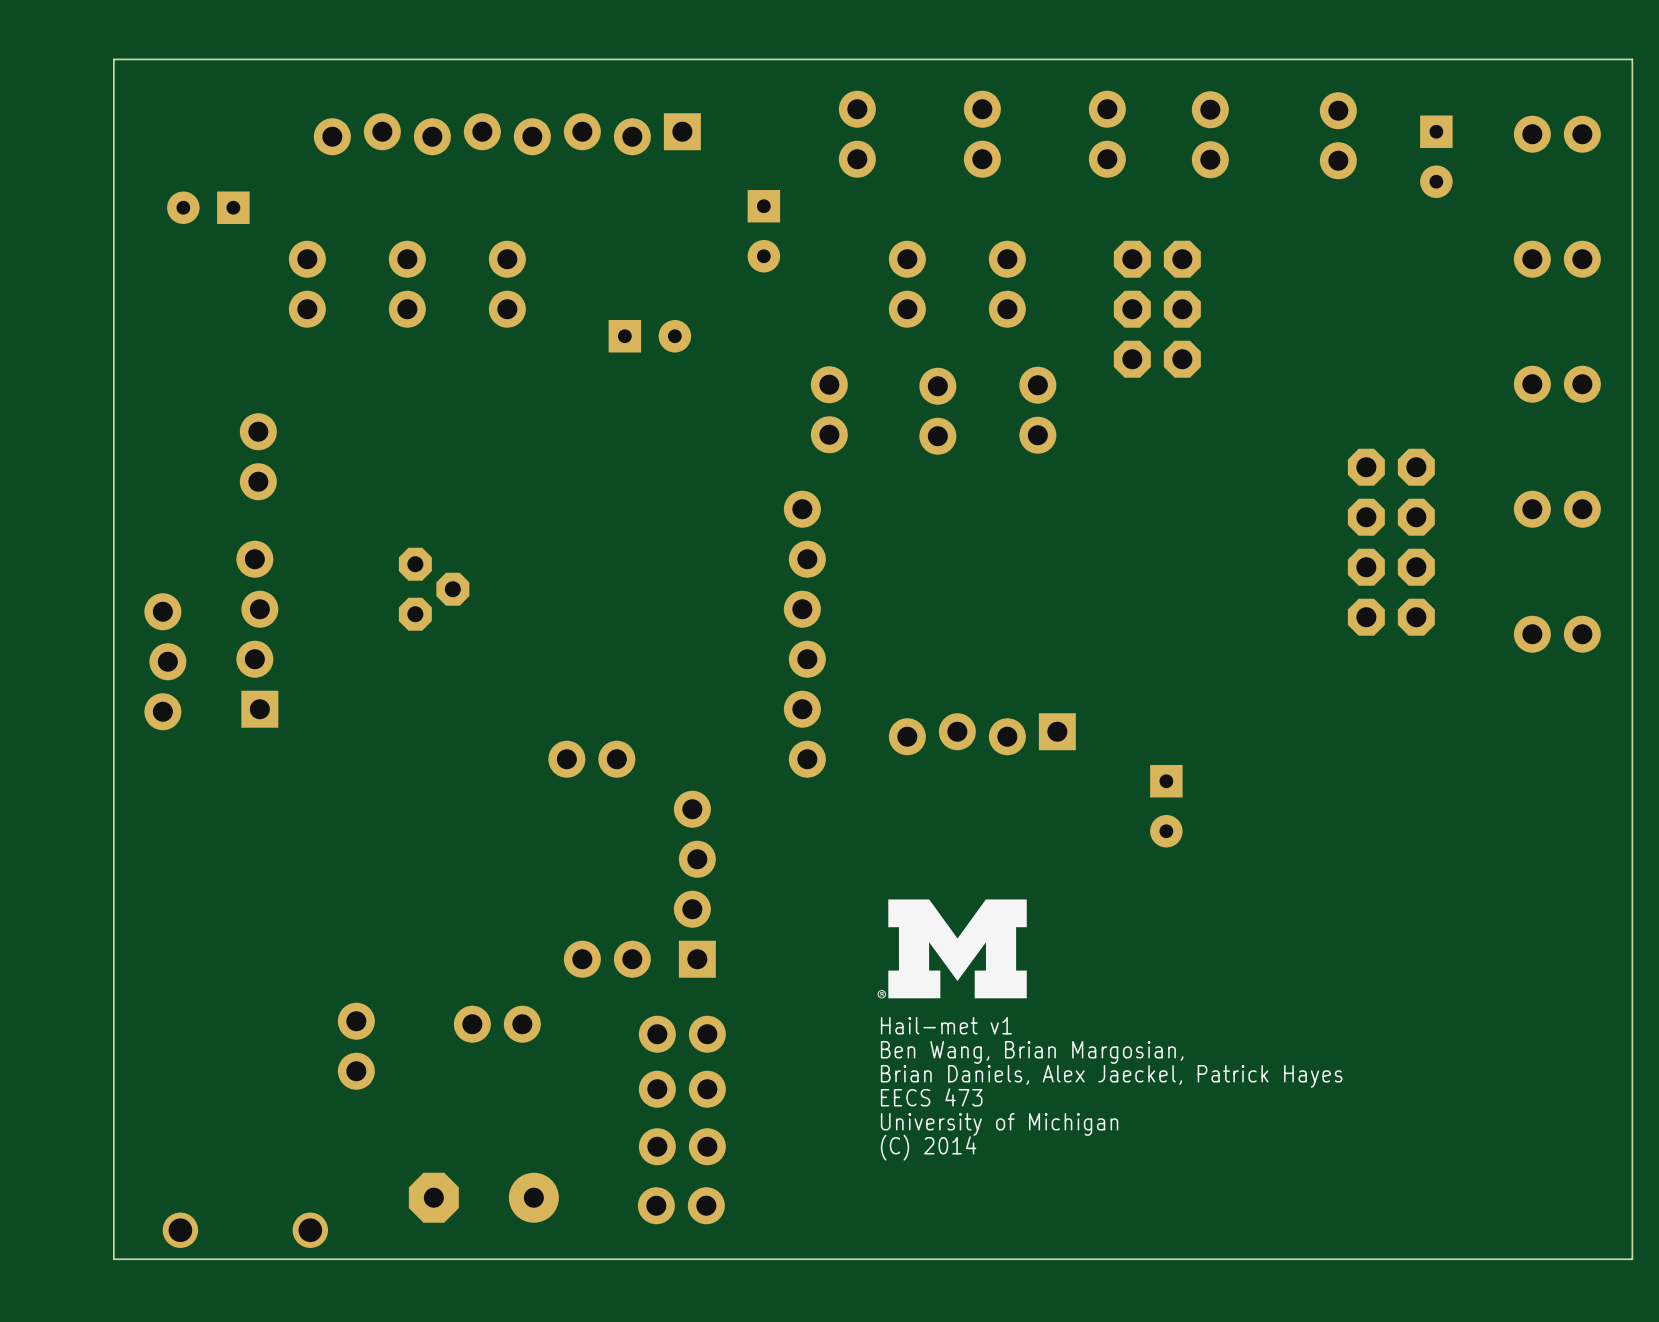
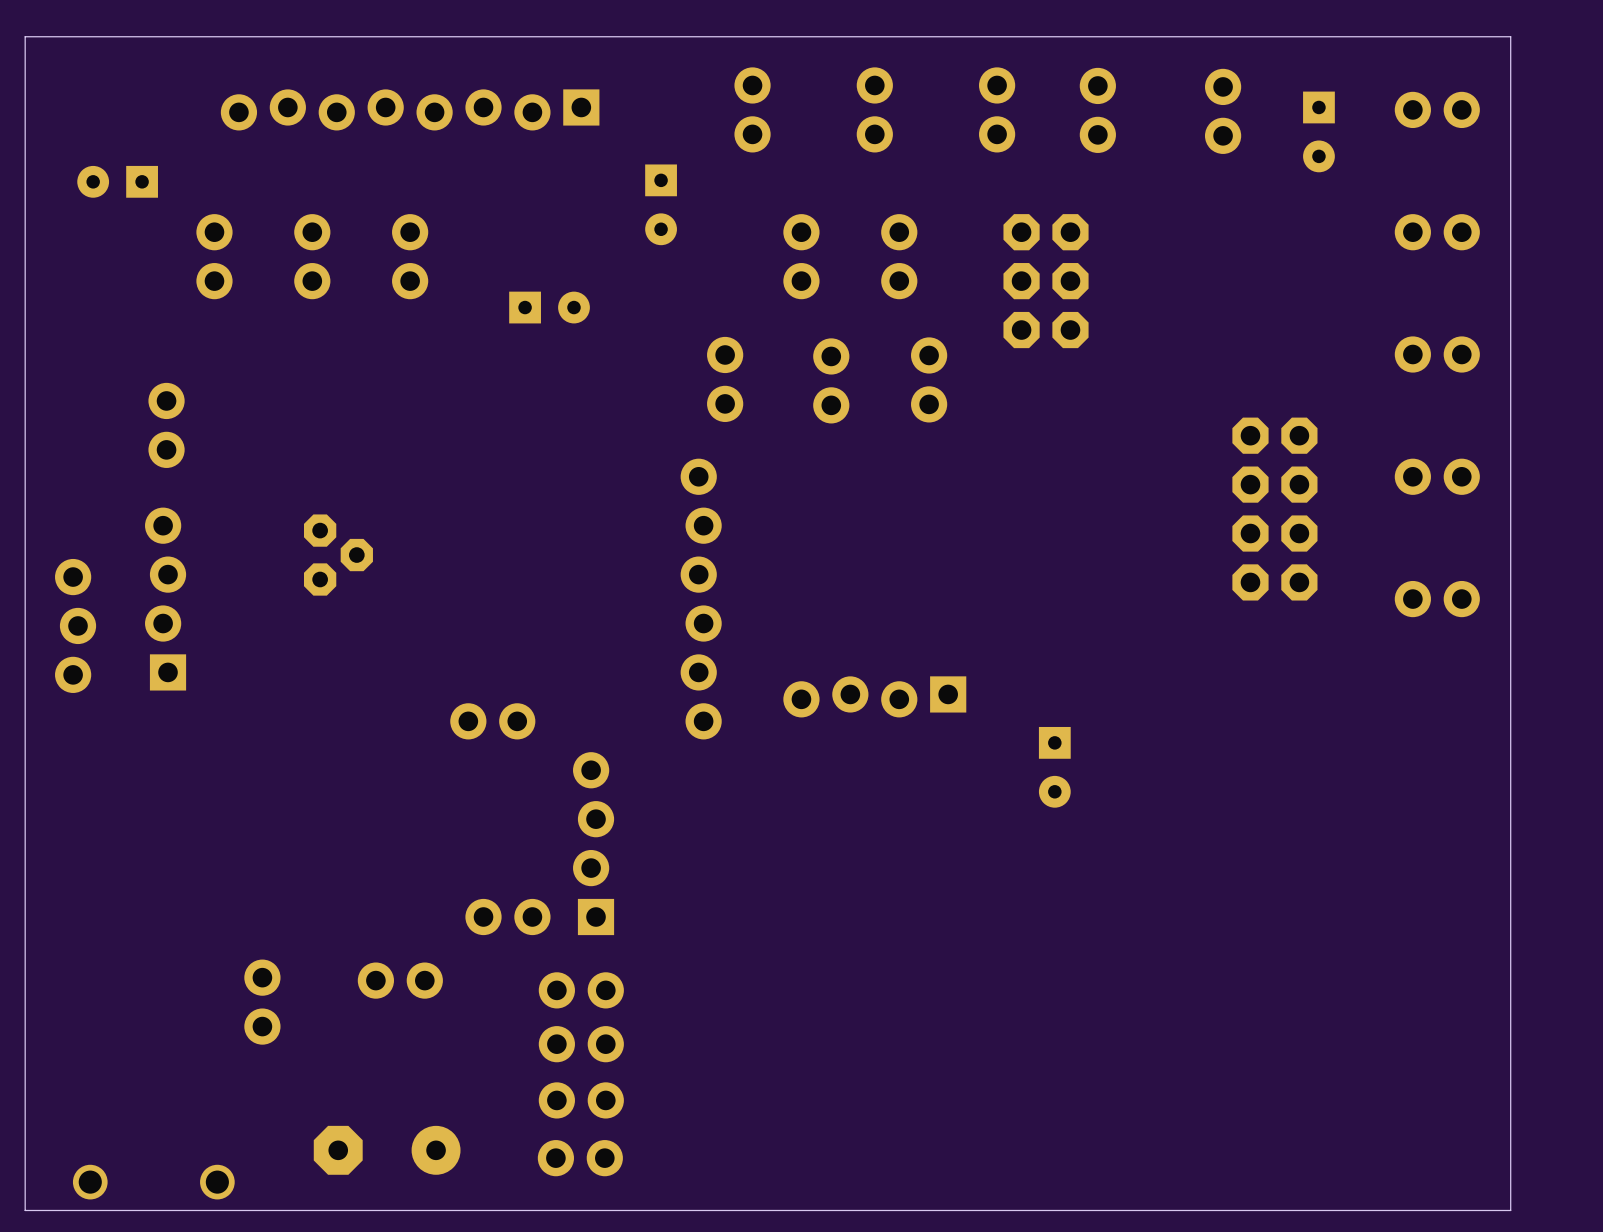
drawing: [877, 899, 1027, 999] -> none
text: Hail-met v1 (946, 1025) -> none
text: Ben Wang, Brian Margosian, (1032, 1052) -> none
text: Brian Daniels, Alex Jaeckel, Patrick Hayes (1111, 1076) -> none
text: EECS 473 (931, 1097) -> none
text: University of Michigan (999, 1124) -> none
text: (C) 2014 (928, 1147) -> none

